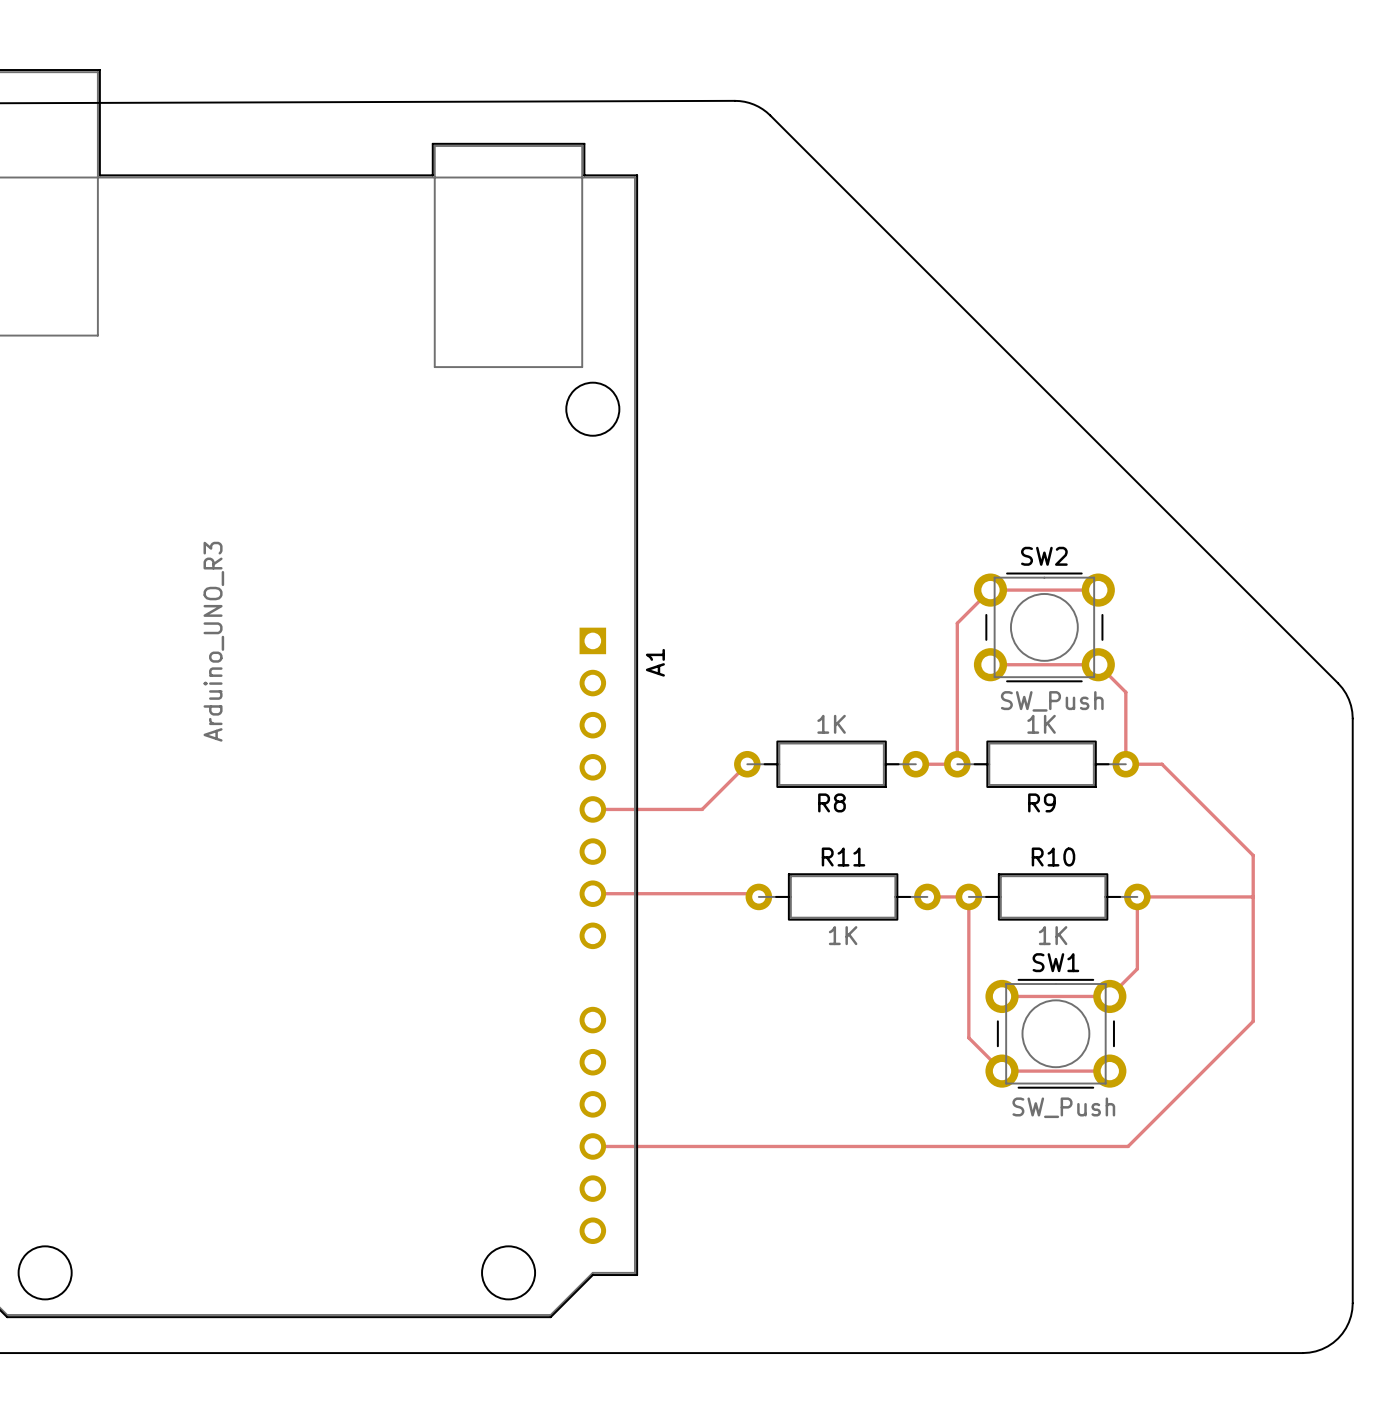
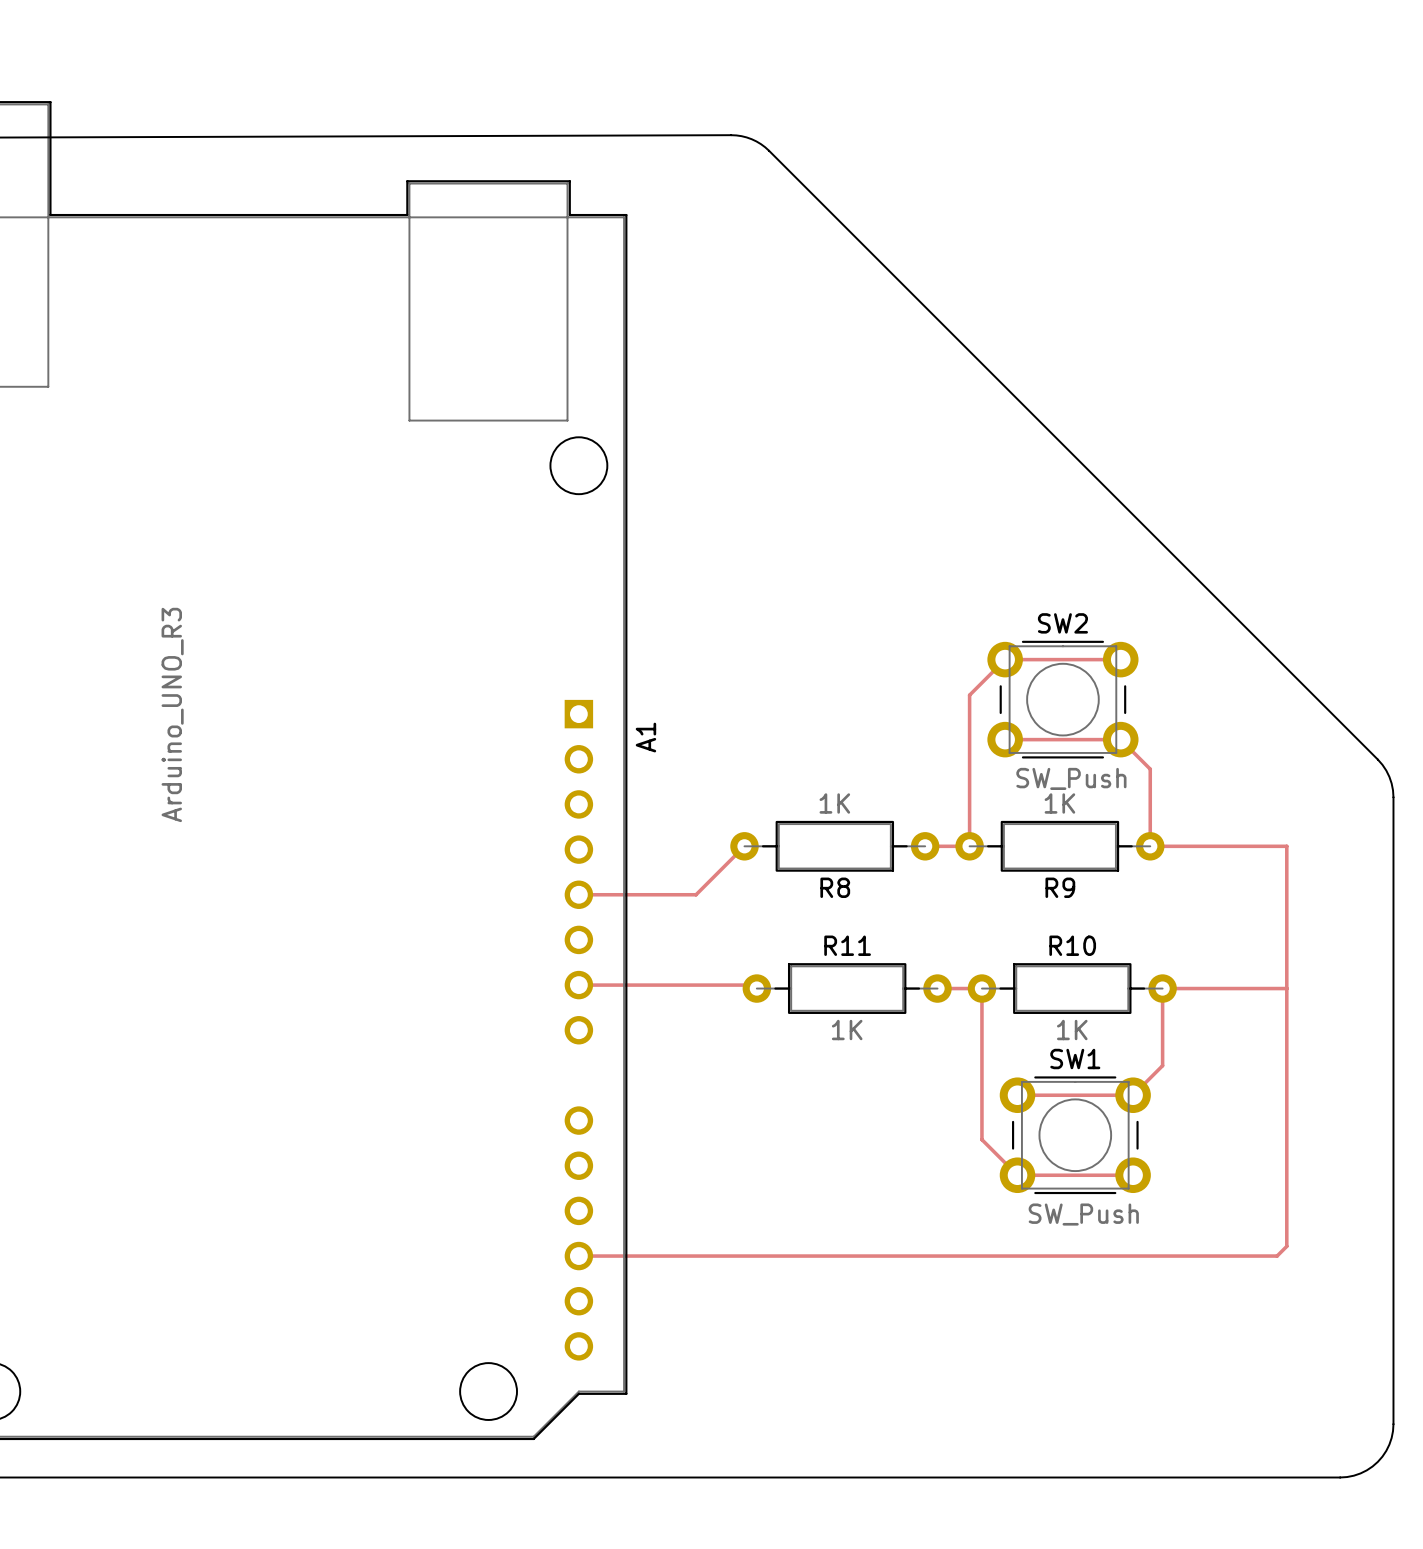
top track: (1161, 764) (1253, 855) -> (1189, 846) (1286, 846) (1286, 944)
top track: (1253, 1021) (1128, 1146) -> (1286, 1121) (1286, 1246) (1277, 1256) (1152, 1256)

